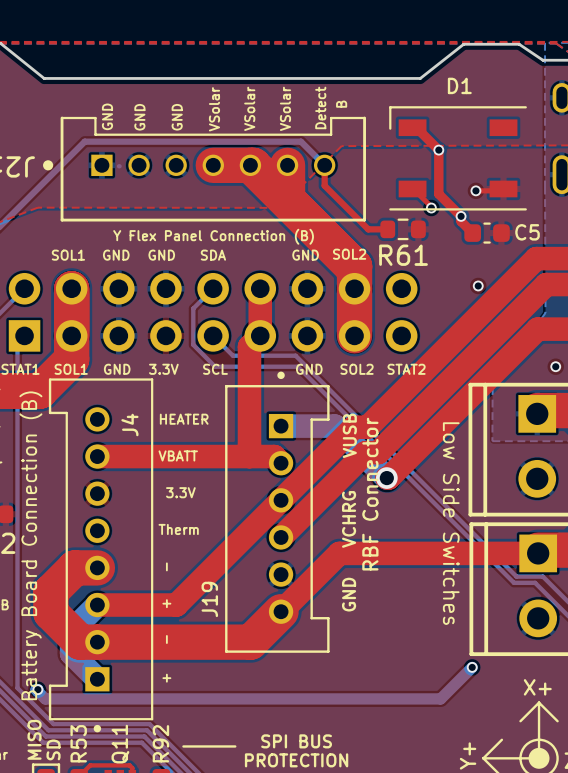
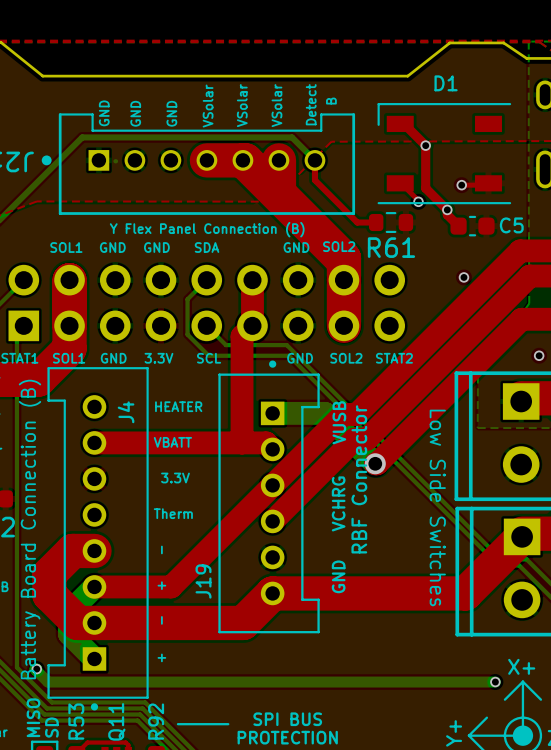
top track: (538, 553) (339, 553) (281, 611) -> (522, 536) (465, 593) (272, 593)
bottom track: (472, 667) (440, 698) (45, 698) -> (495, 682) (47, 682) (43, 678)
via position: (472, 667) -> (495, 682)

